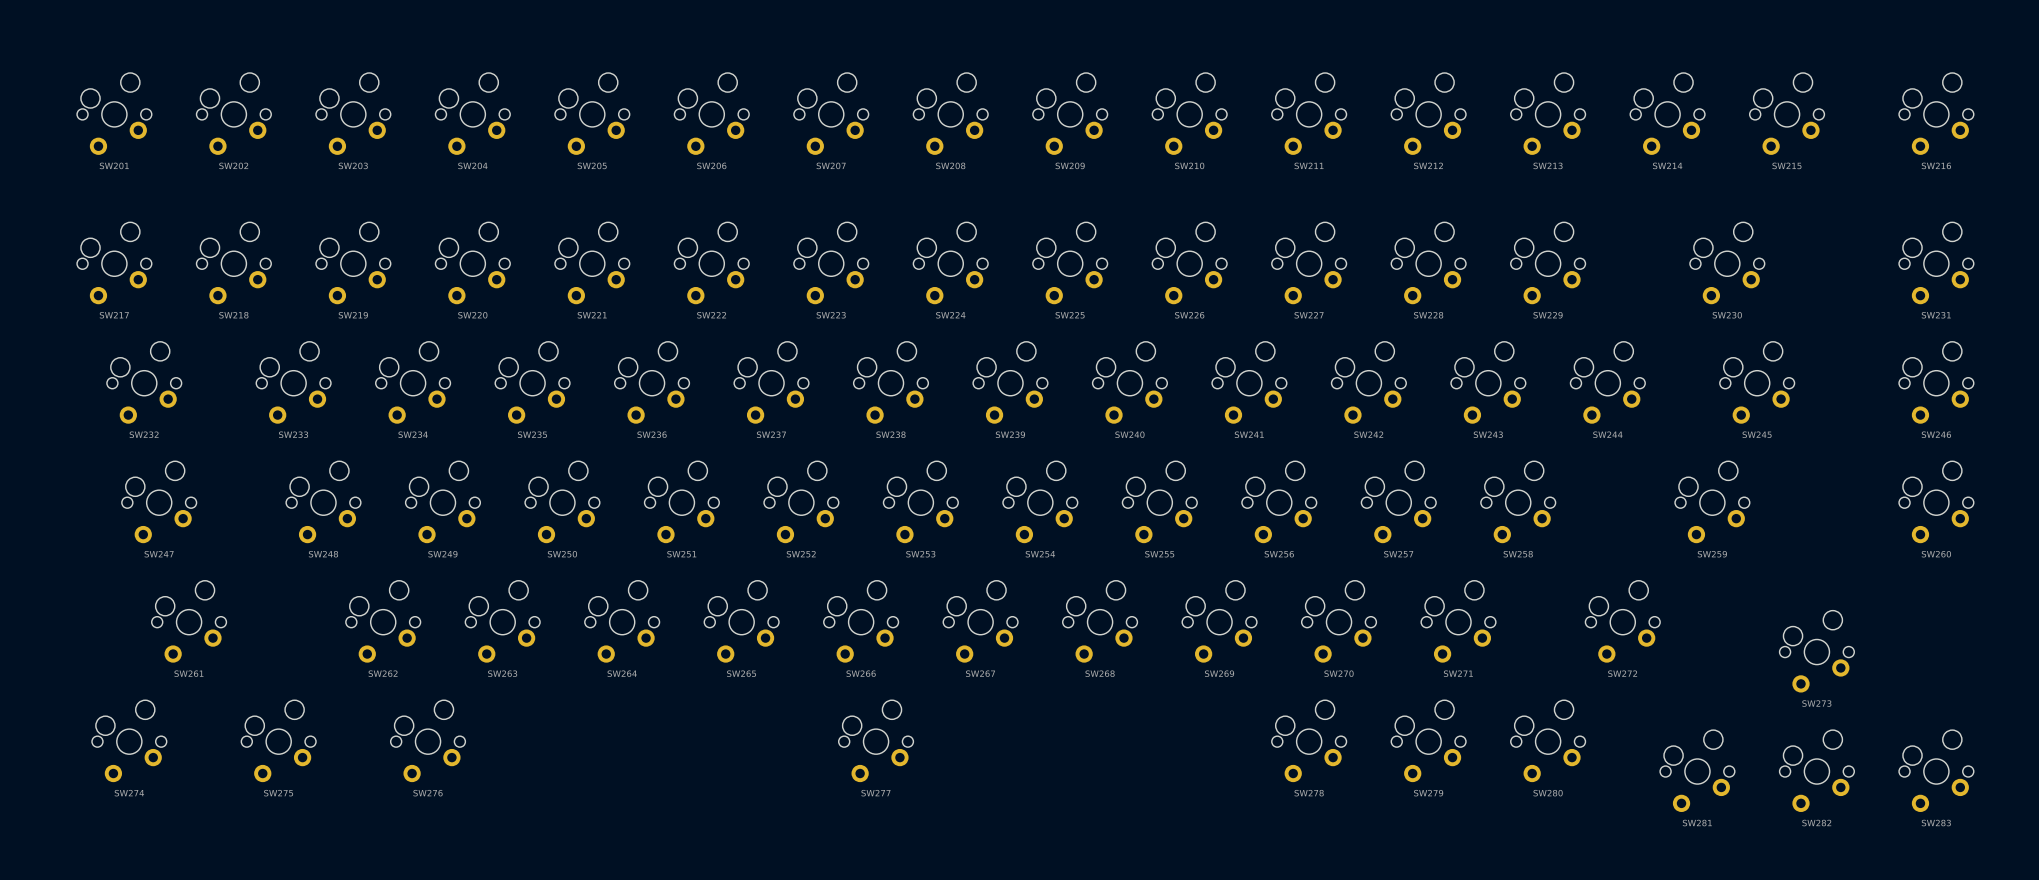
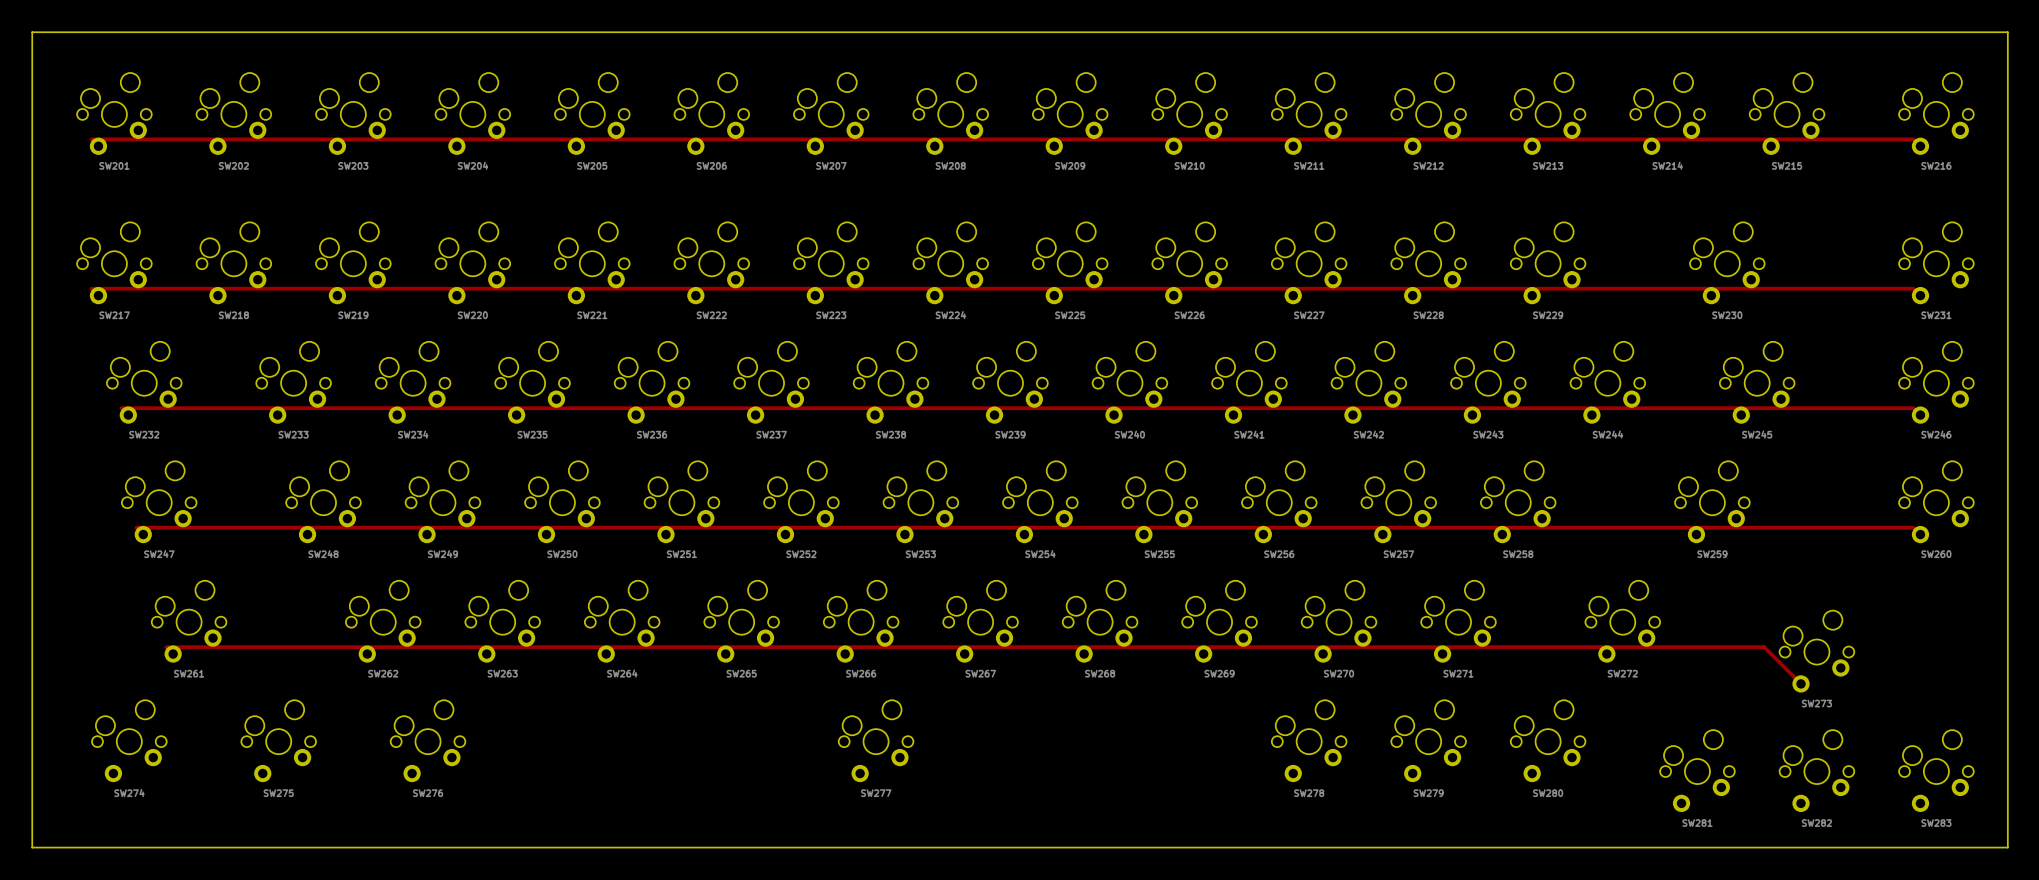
board edge: none -> (32, 32) (2007, 32) (2007, 847) (32, 847) (32, 32)
track: none -> (91, 139) (1913, 139)
track: none -> (91, 288) (1913, 288)
track: none -> (121, 408) (1913, 408)
track: none -> (136, 527) (1913, 527)
track: none -> (166, 647) (1764, 647) (1794, 677)

